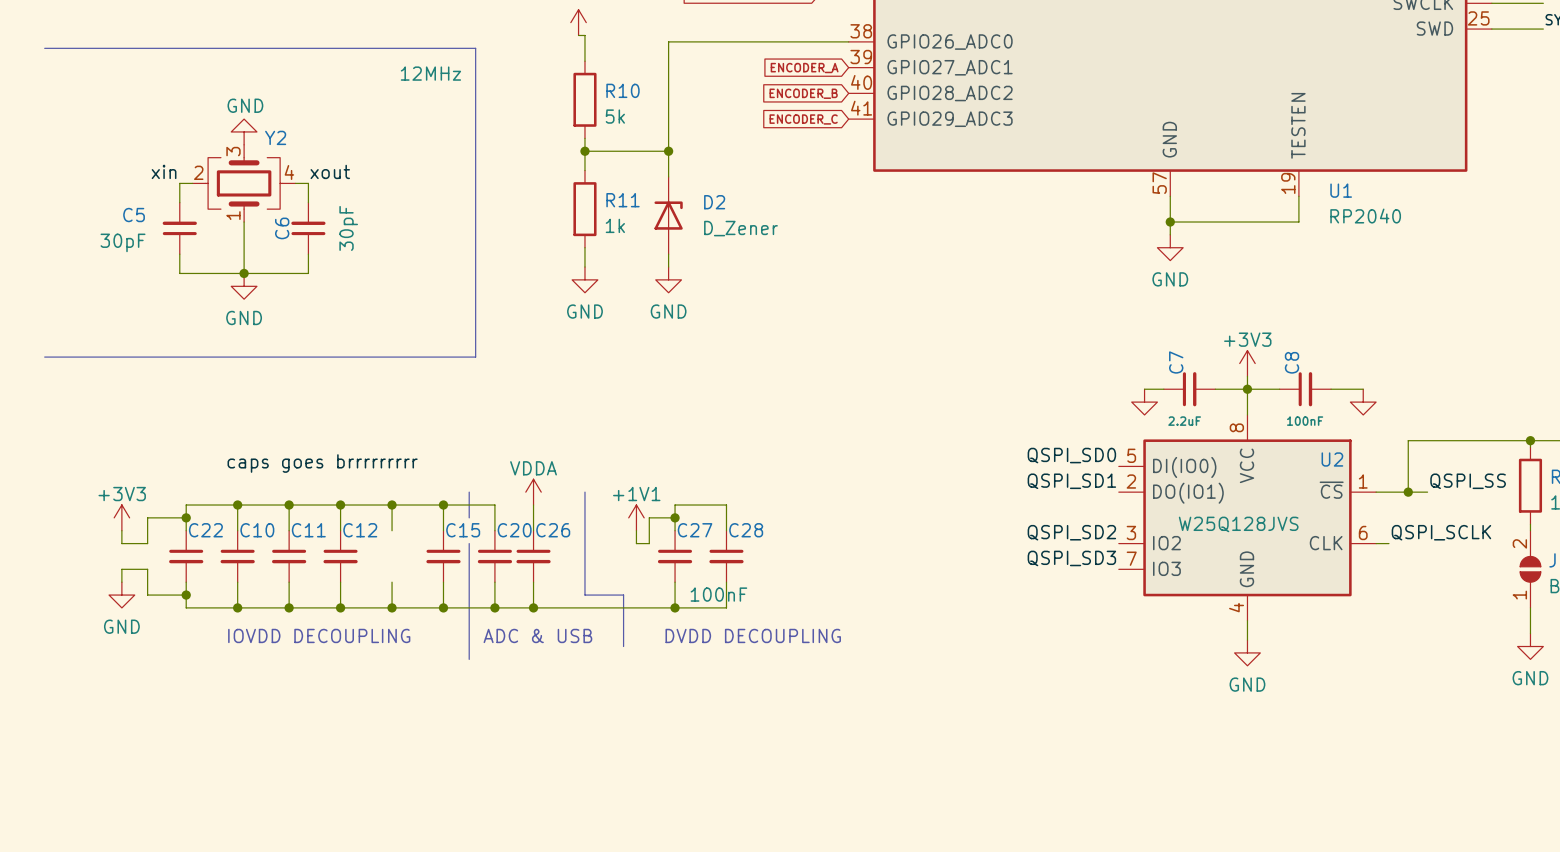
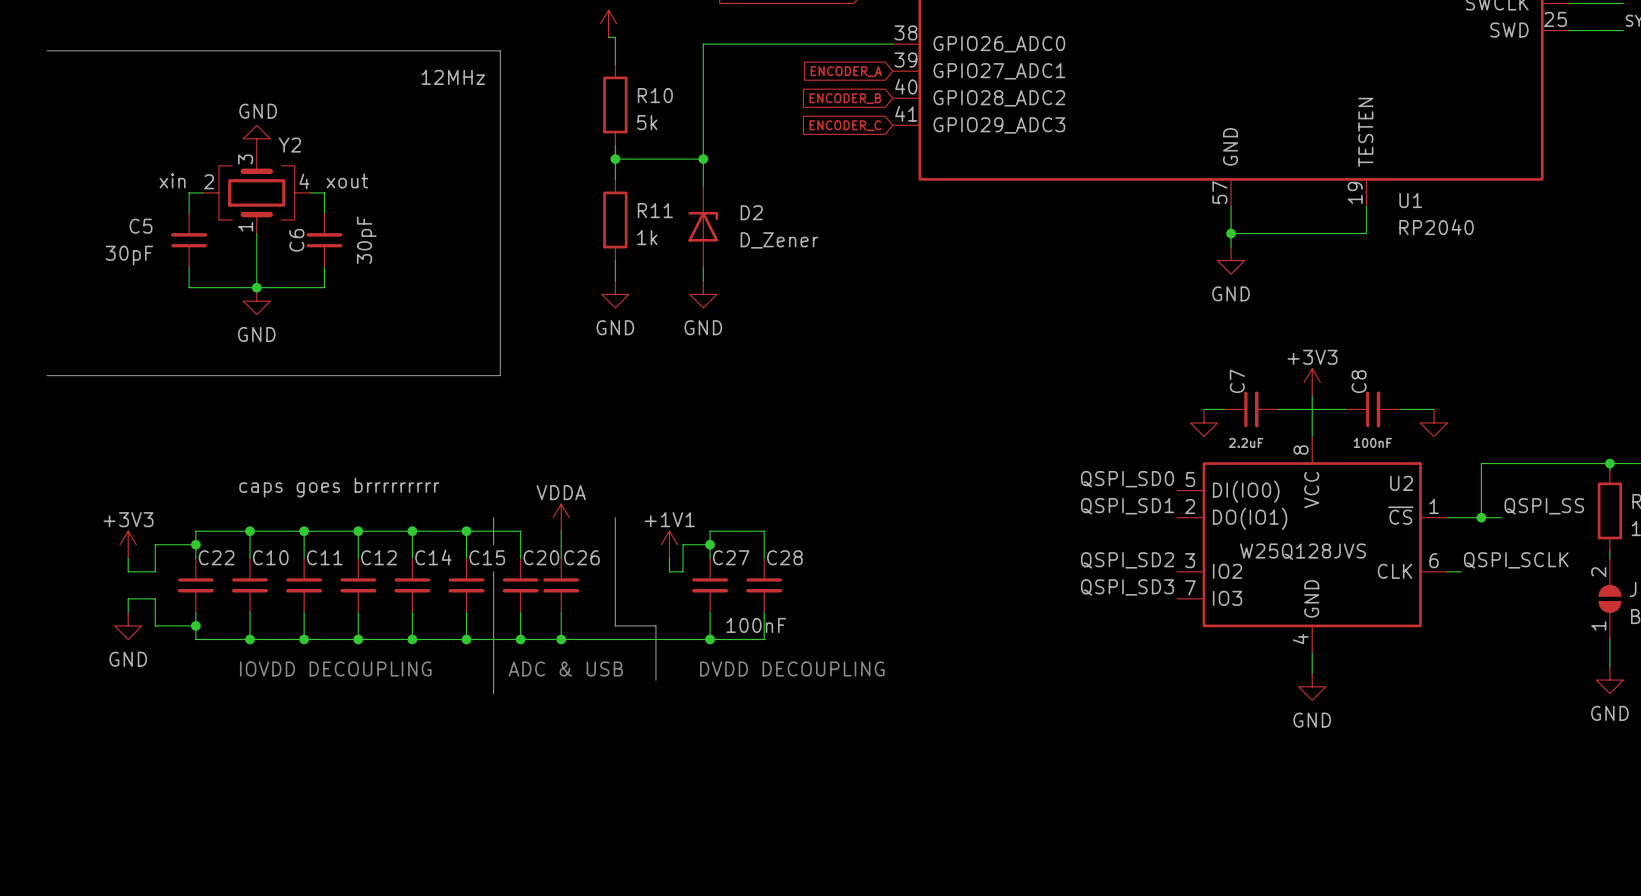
junction: (1247, 389) -> none
C14: none -> (412, 585)

